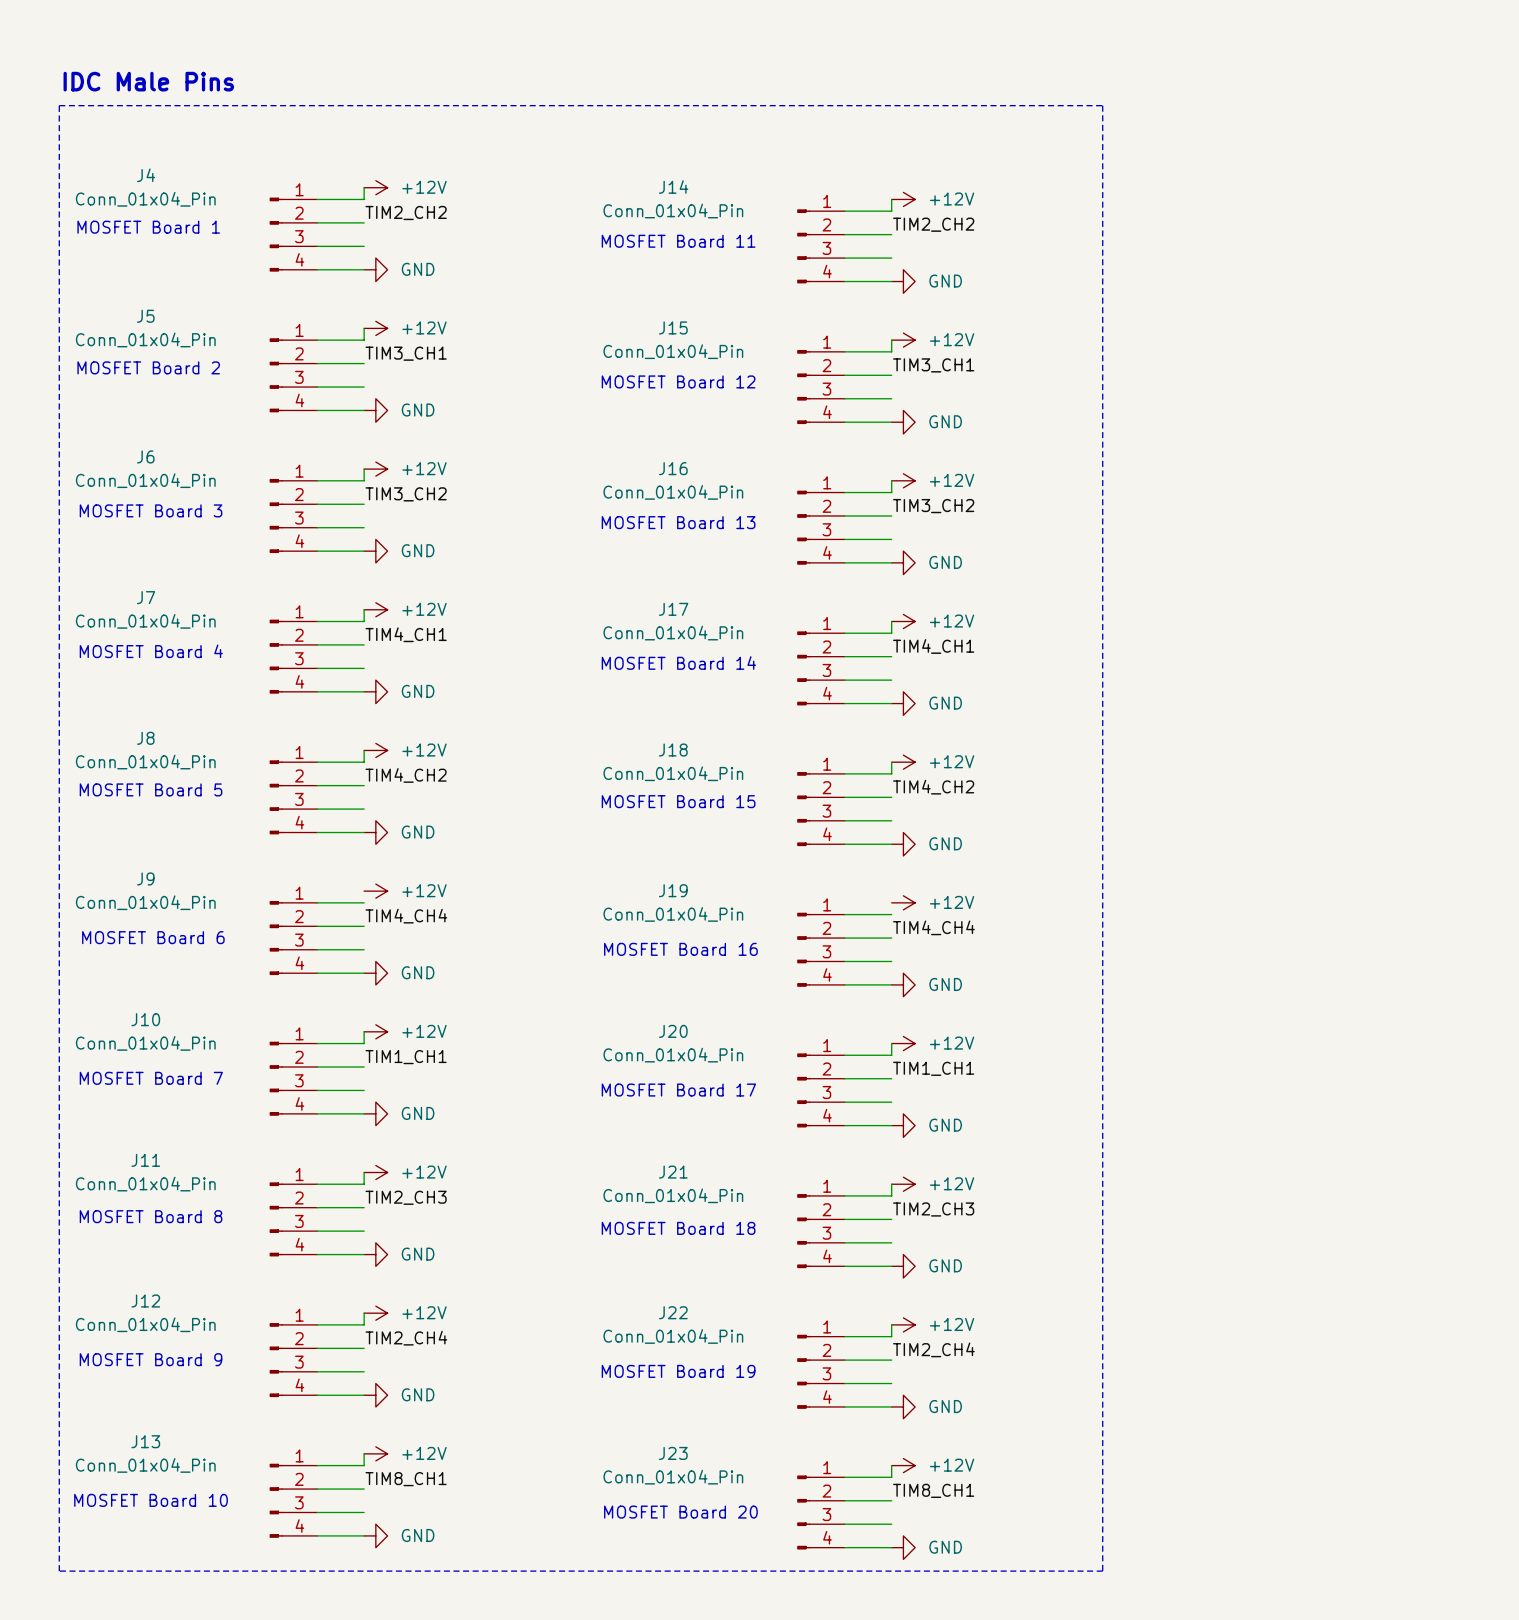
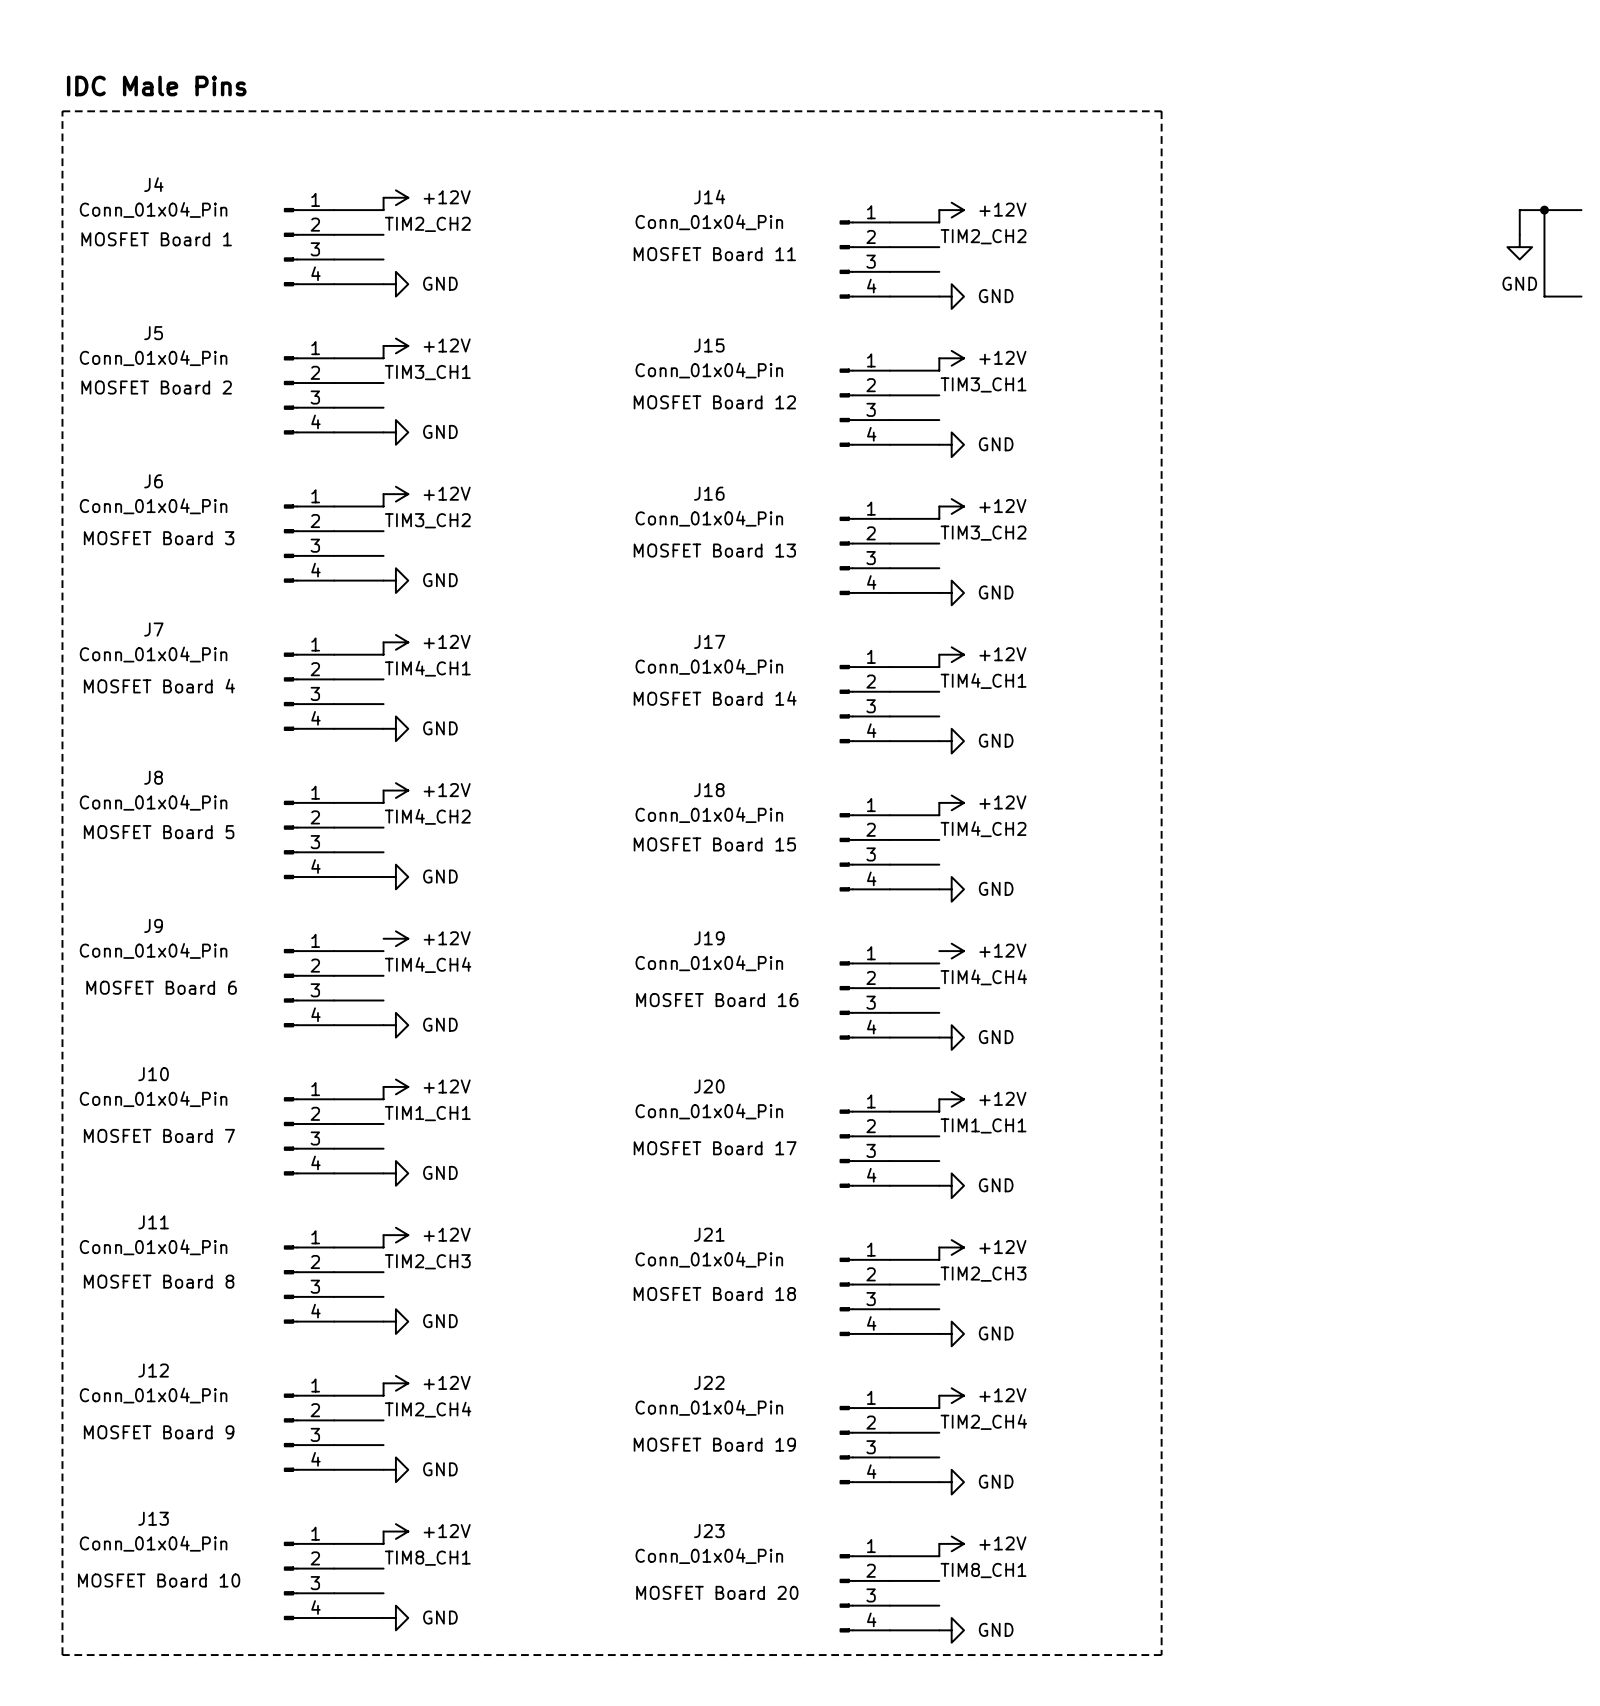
wire: none -> (1544, 210) (1544, 296) (1581, 296)
junction: none -> (1544, 210)
wire: none -> (1581, 210) (1519, 210) (1519, 234)
power symbol: none -> GND (1519, 247)

